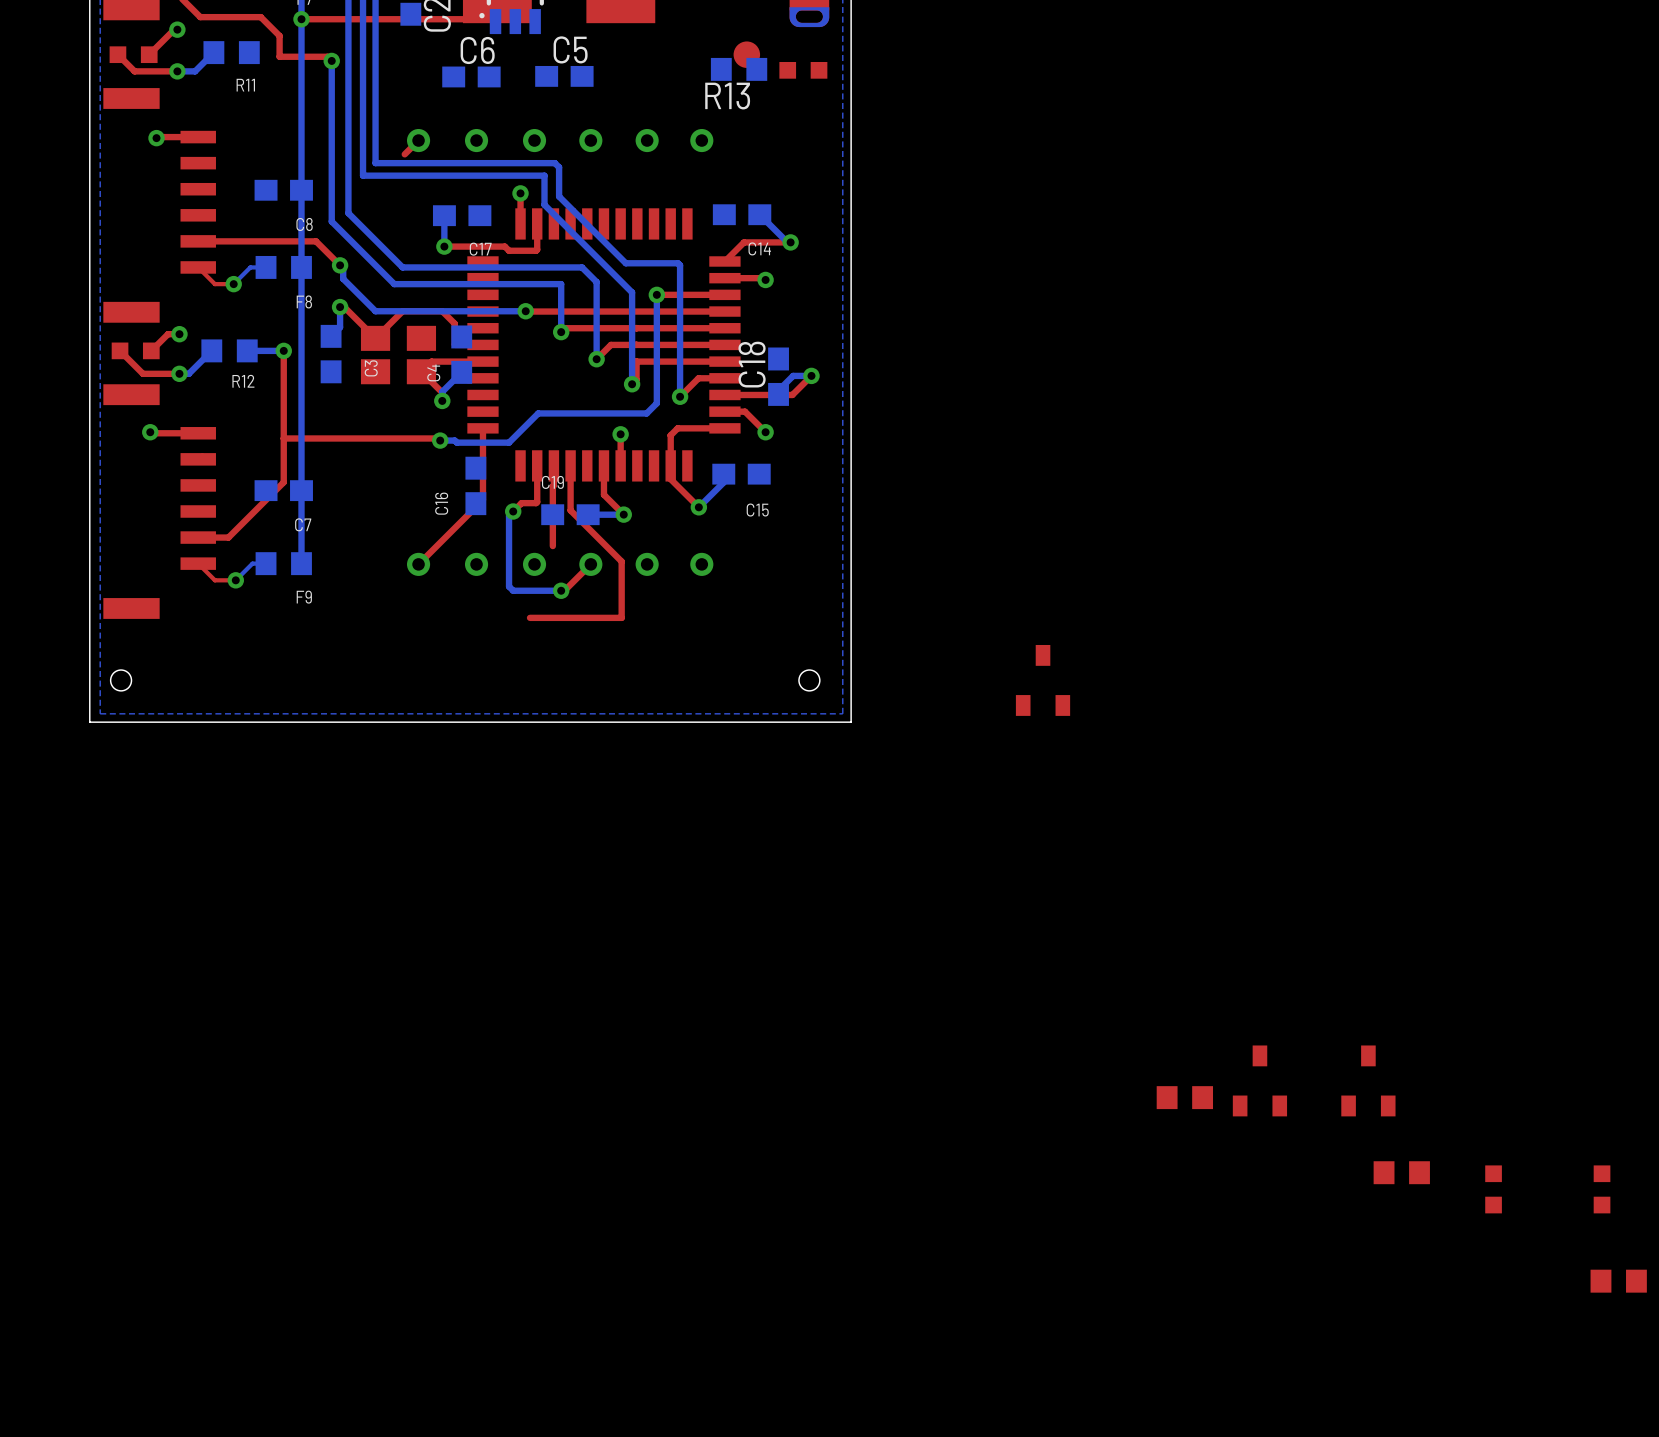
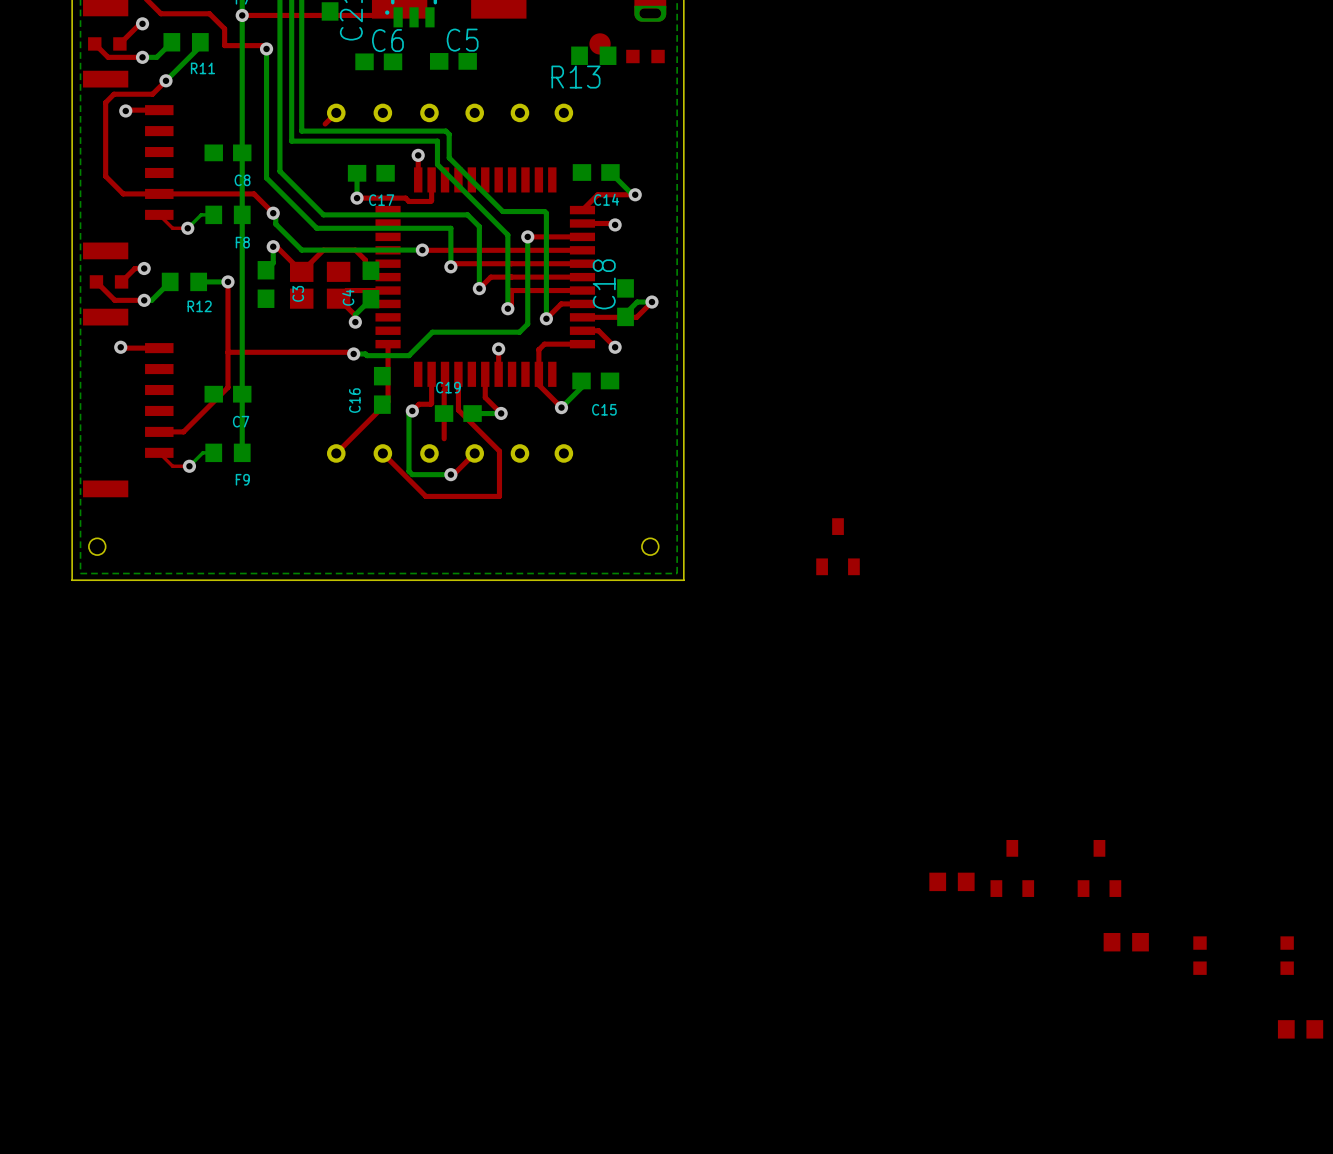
bottom track: none -> (200, 42) (200, 46) (165, 80)
top track: none -> (165, 80) (152, 94) (114, 94) (105, 102) (105, 176) (123, 193) (159, 193)
via: none -> (165, 80)
top track: none -> (382, 453) (425, 496)

